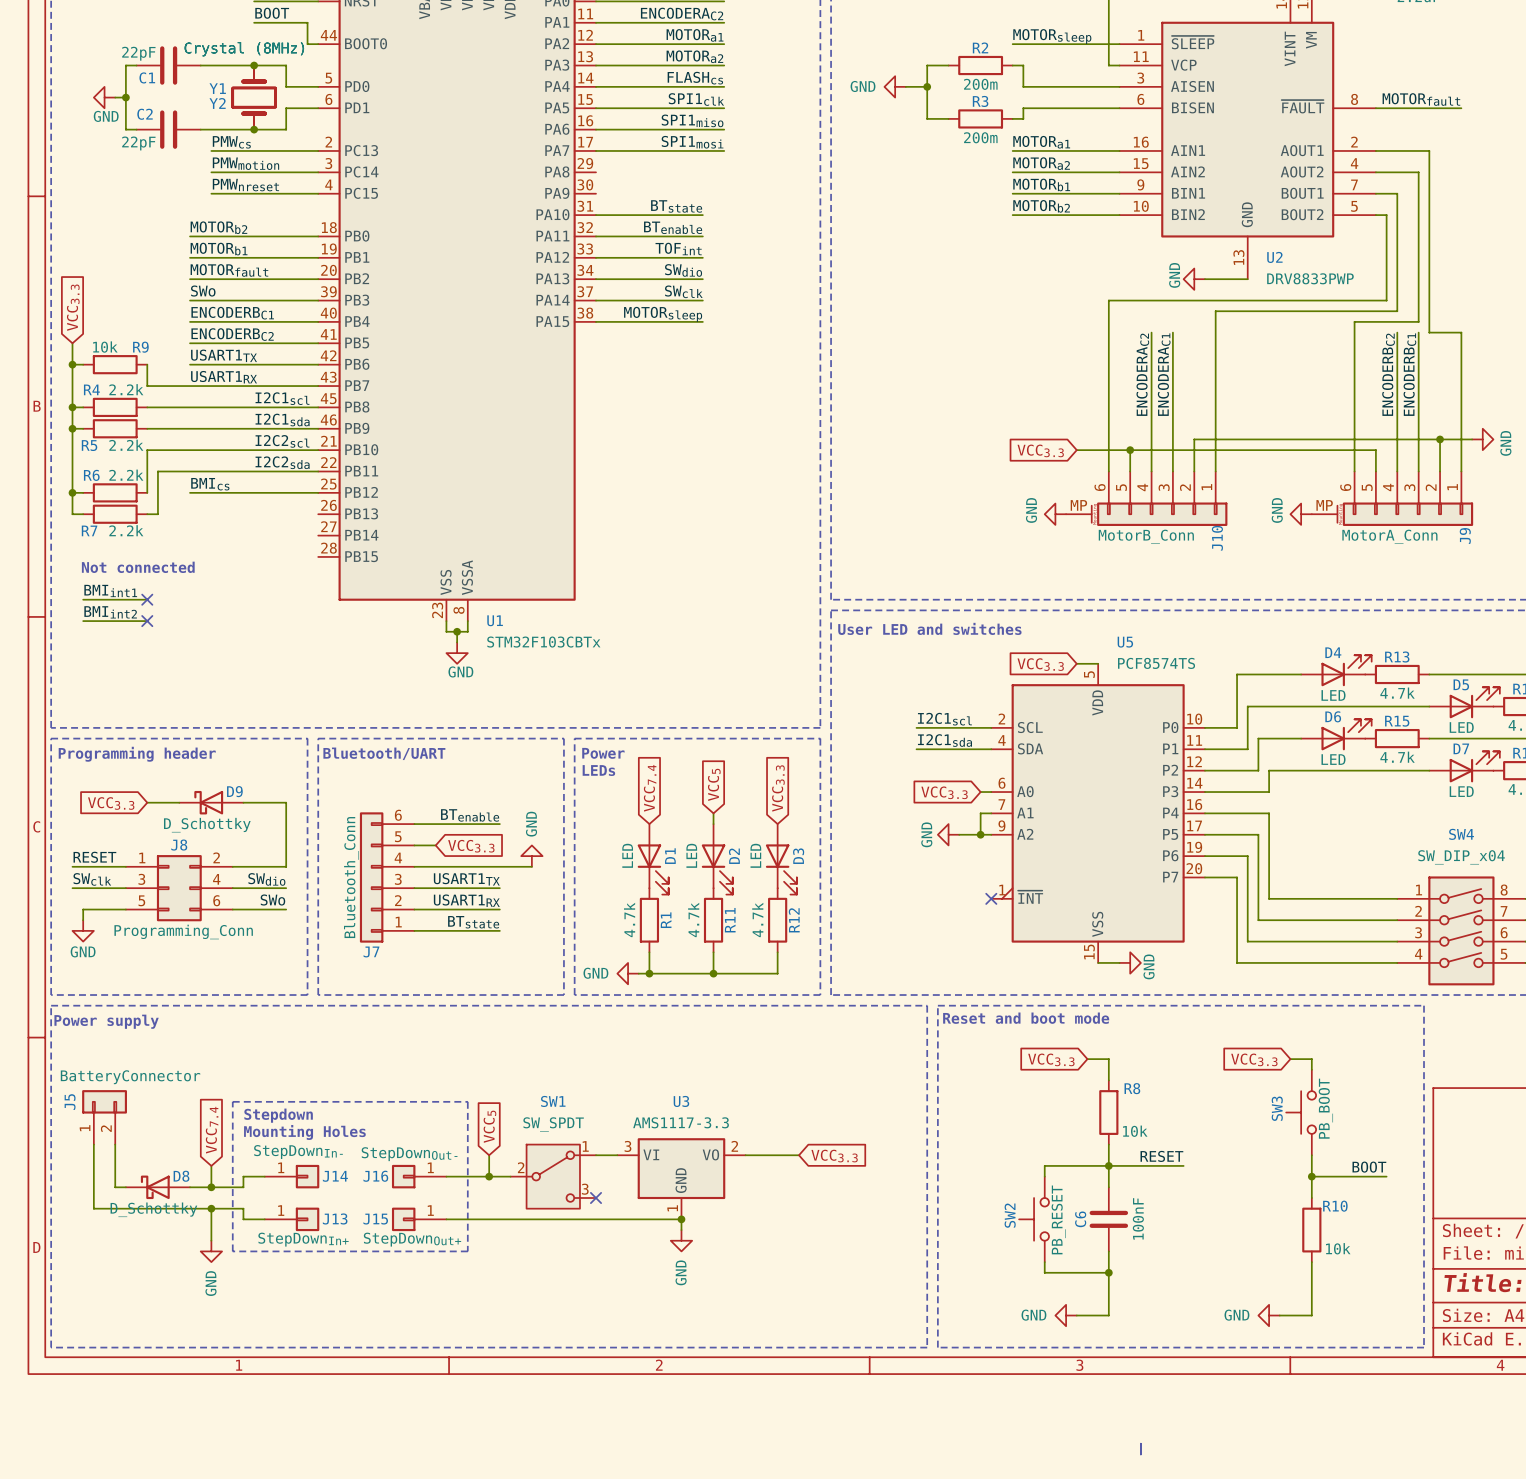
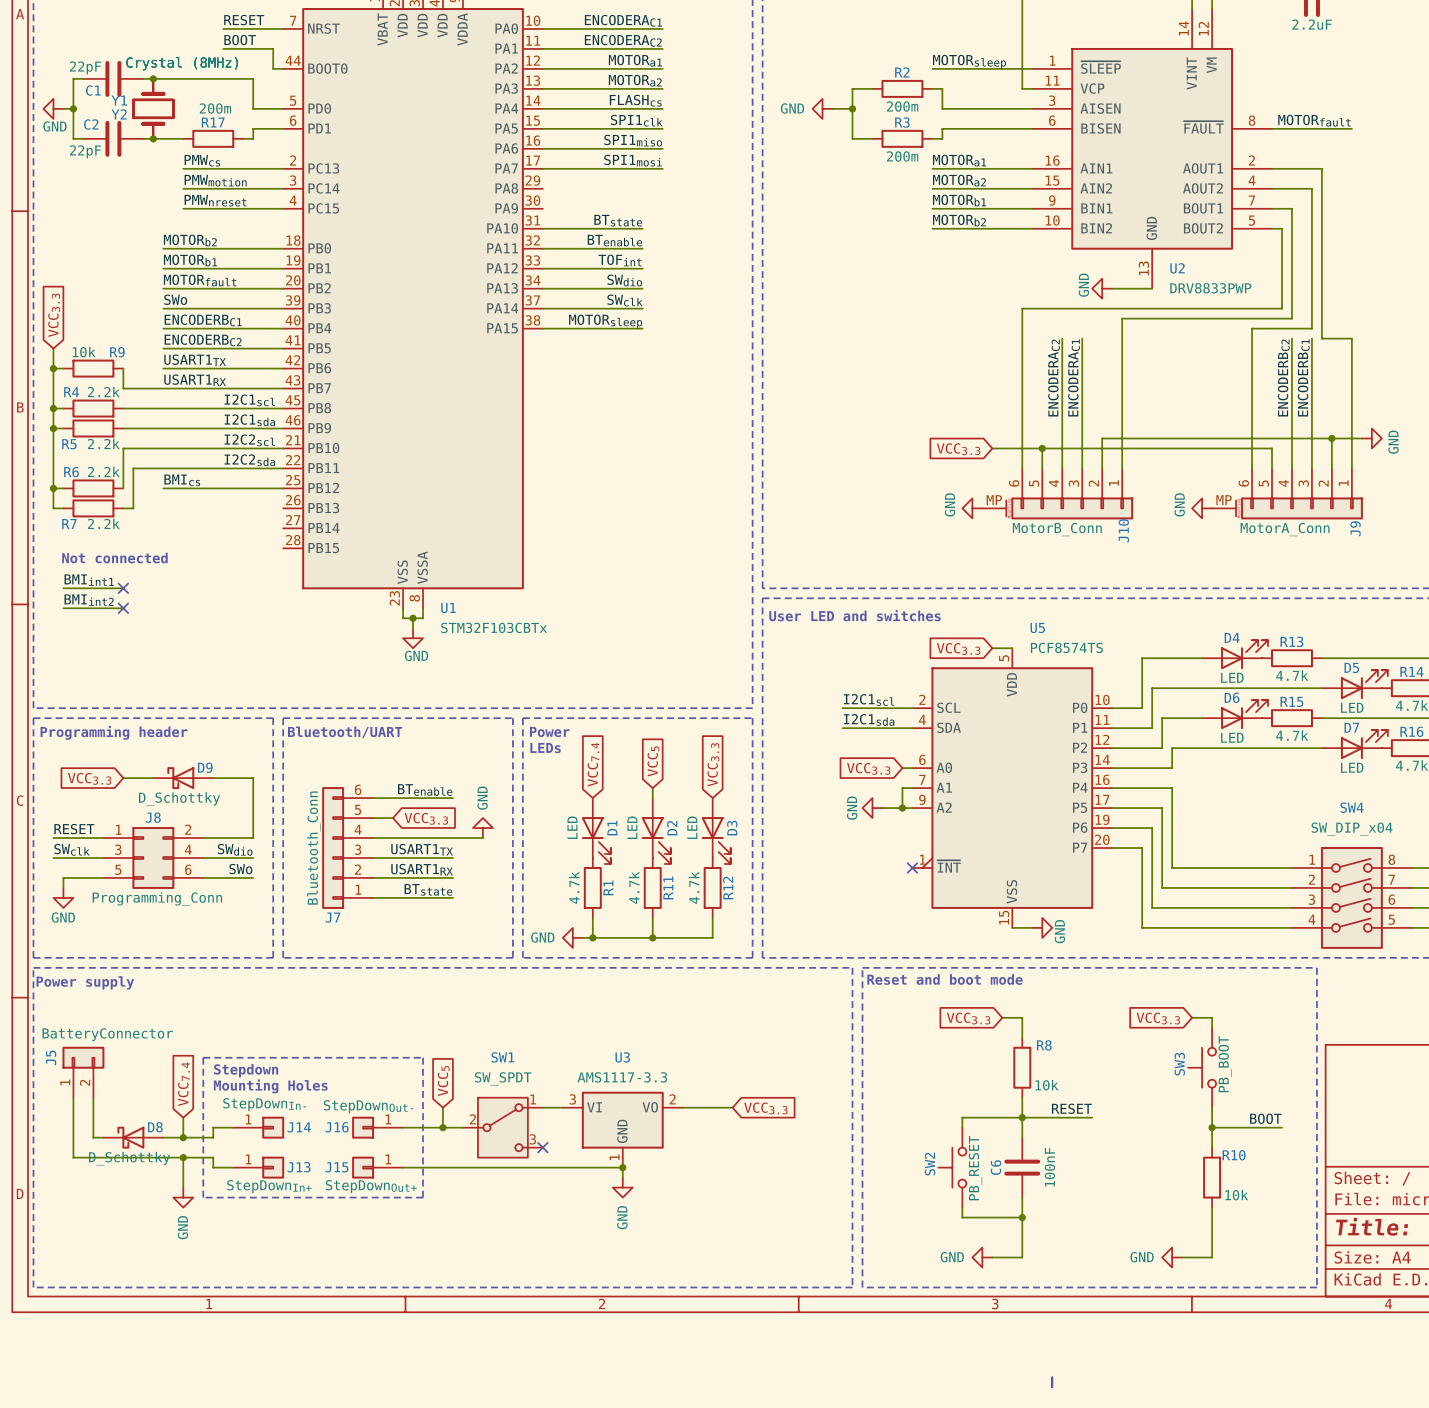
Y1 value position: Crystal (8MHz) (244, 49) -> Crystal (8MHz) (182, 63)
Y2 value position: Crystal (8MHz) (244, 49) -> Crystal (8MHz) (182, 63)
junction: none -> (153, 78)
wire: (136, 65) (125, 65) (125, 129) (136, 129) -> (83, 78) (73, 78) (73, 138) (83, 138)
C1 position: (168, 65) -> (113, 78)
wire: (200, 65) (286, 65) -> (143, 78) (253, 78) (253, 88)
junction: (254, 65) -> none
junction: none -> (73, 108)
power symbol position: GND (104, 97) -> GND (53, 108)
wire: (115, 97) (125, 97) -> (63, 108) (73, 108)
junction: (125, 97) -> none
Y1 position: (254, 97) -> (153, 108)
Y2 position: (254, 97) -> (153, 108)
wire: none -> (143, 138) (183, 138)
junction: none -> (153, 138)
R17: none -> 200m (213, 138)
wire: (286, 118) (286, 129) (200, 129) -> (253, 138) (243, 138)
C2 position: (168, 129) -> (113, 138)
junction: (254, 129) -> none

